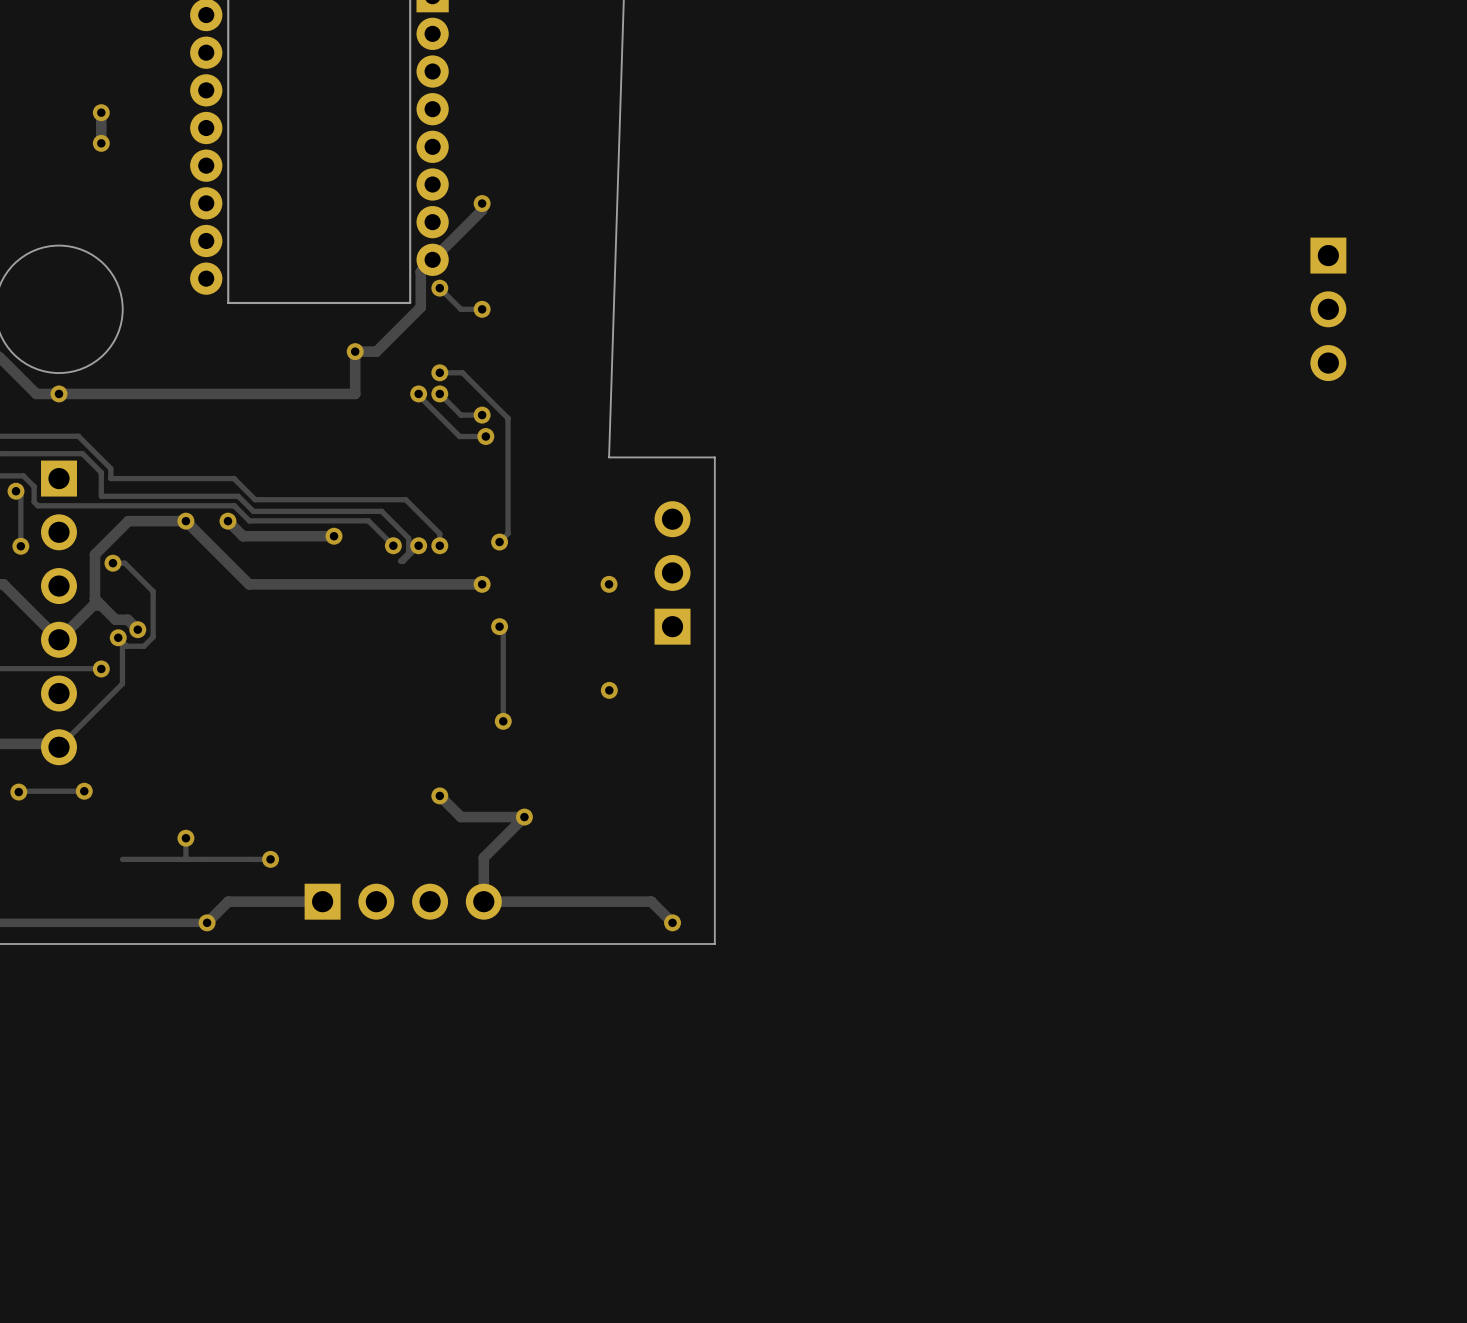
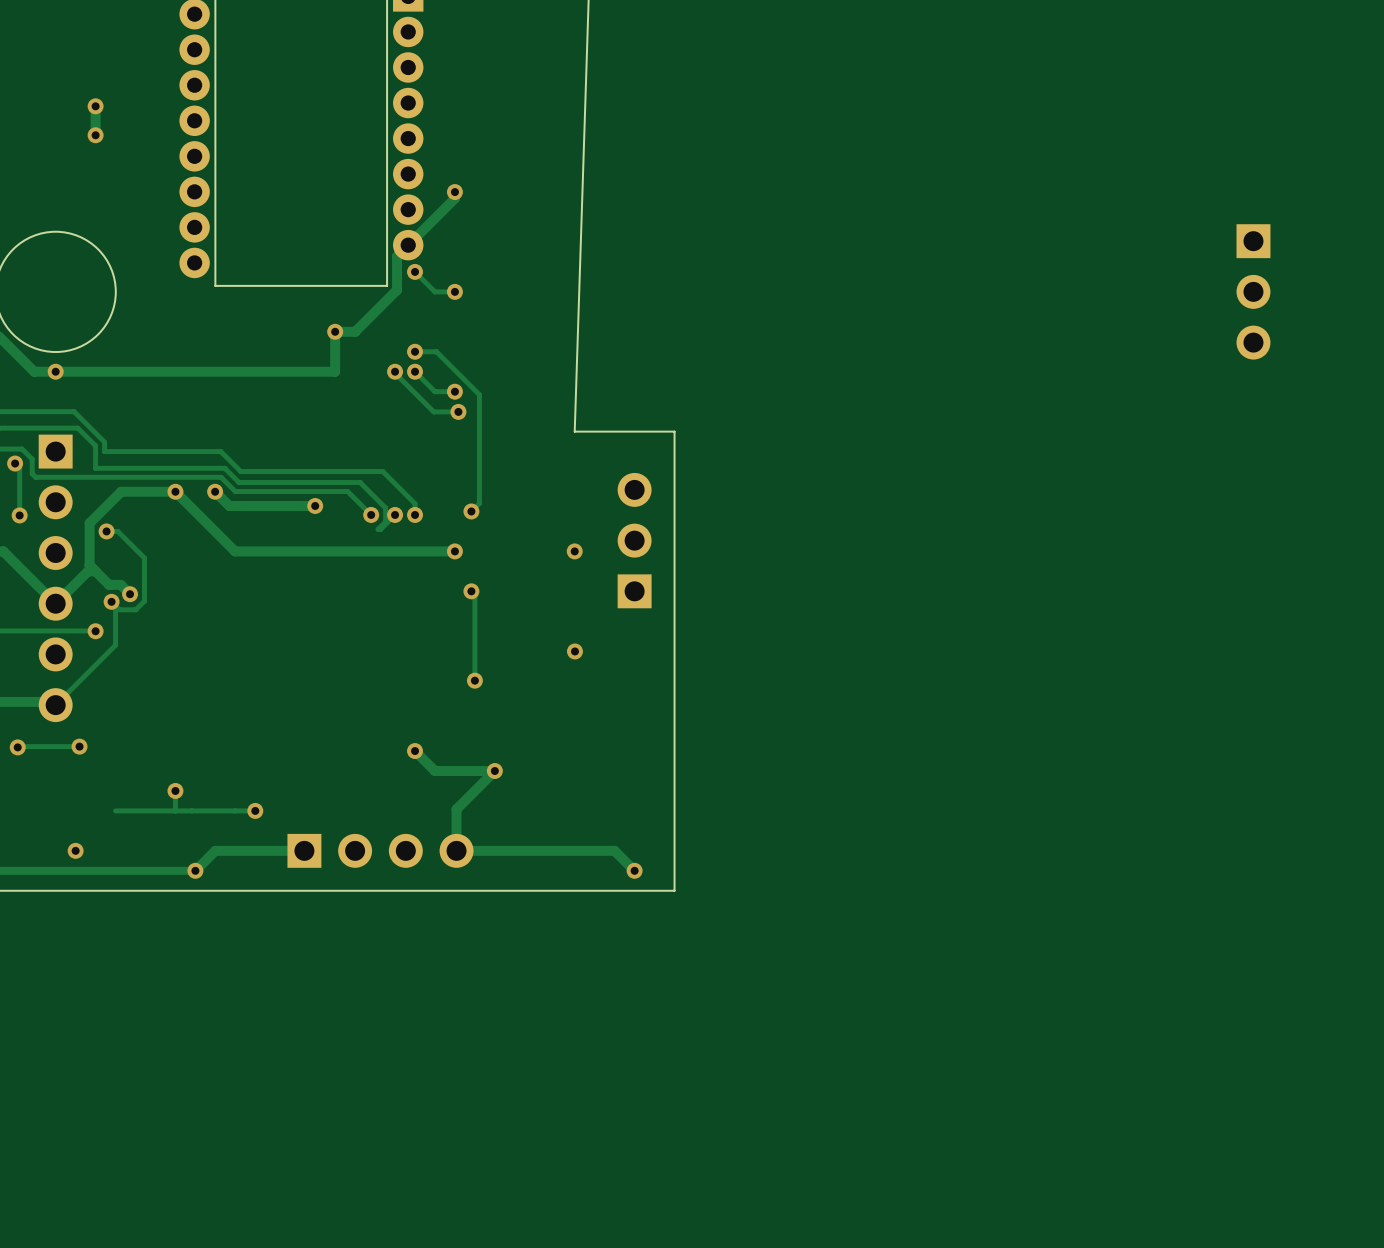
via: none -> (75, 850)

